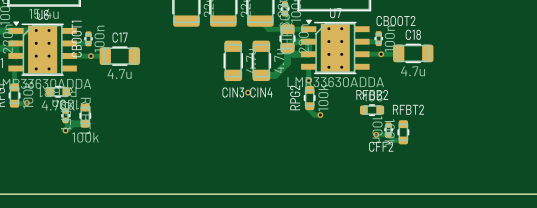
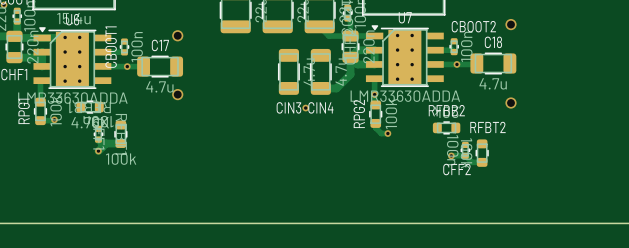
via: none -> (510, 24)
via: none -> (177, 35)
via: none -> (177, 94)
via: none -> (510, 102)

